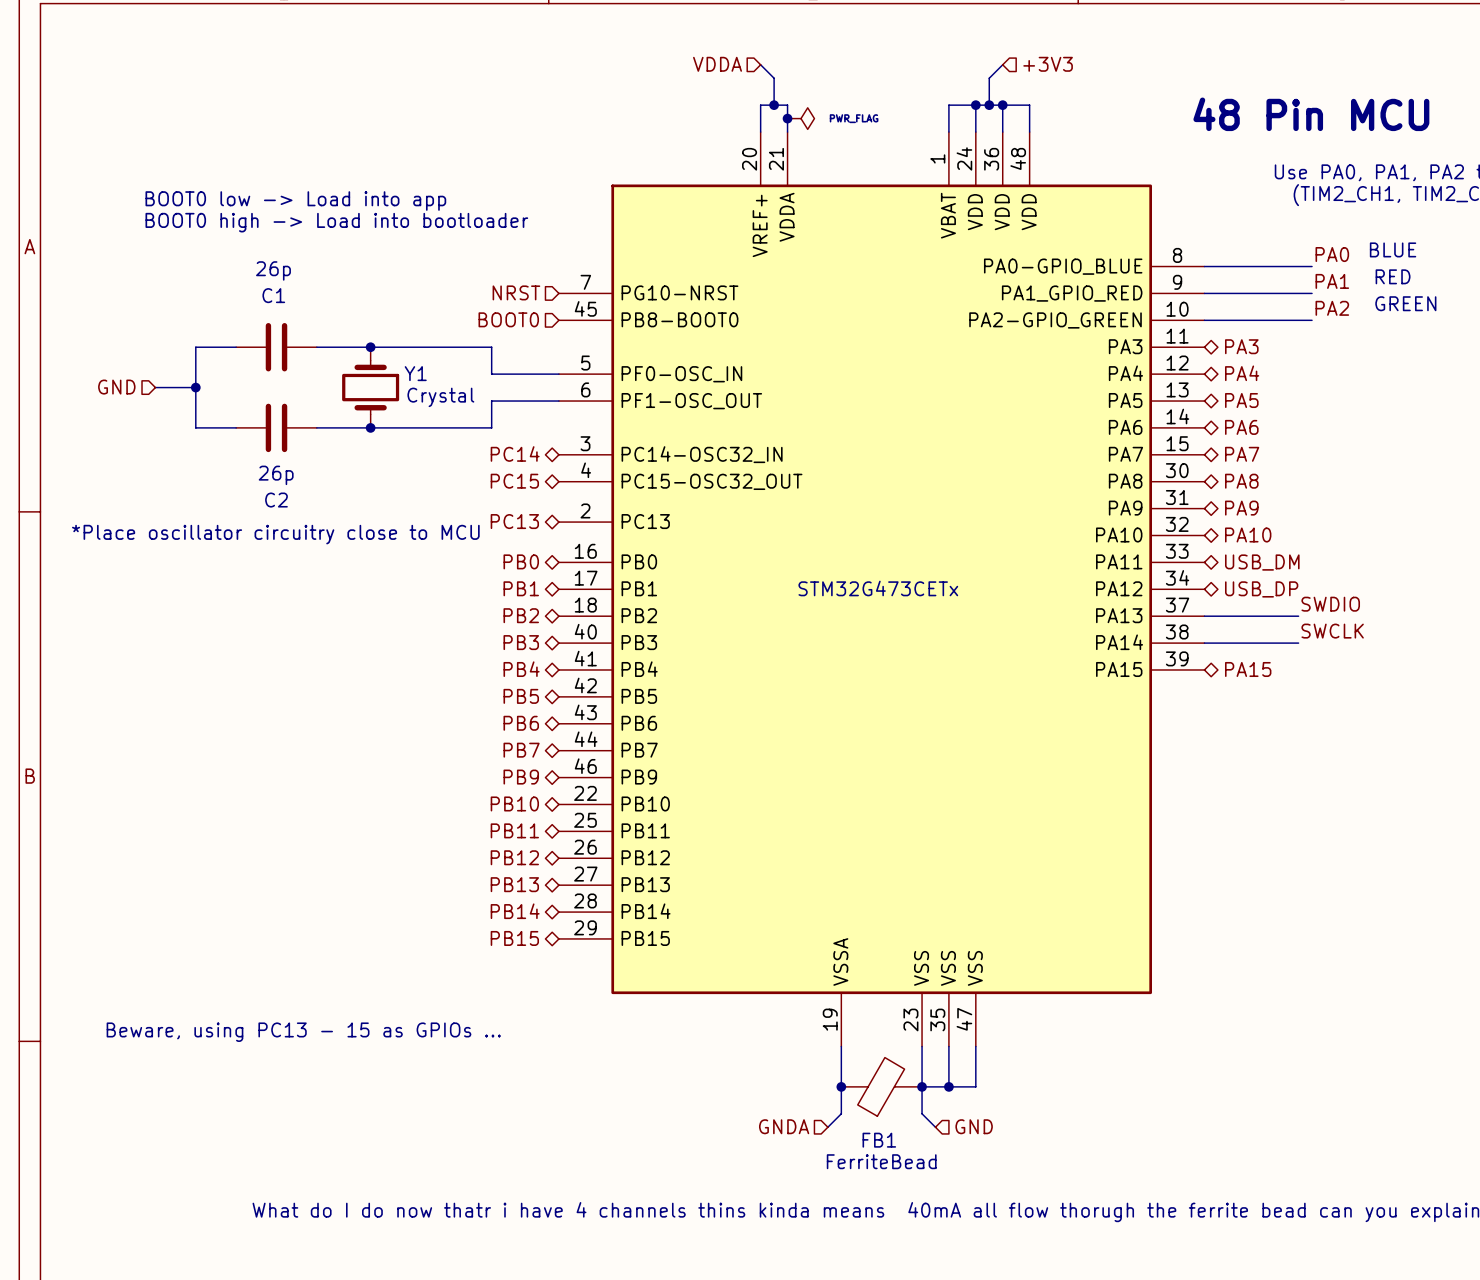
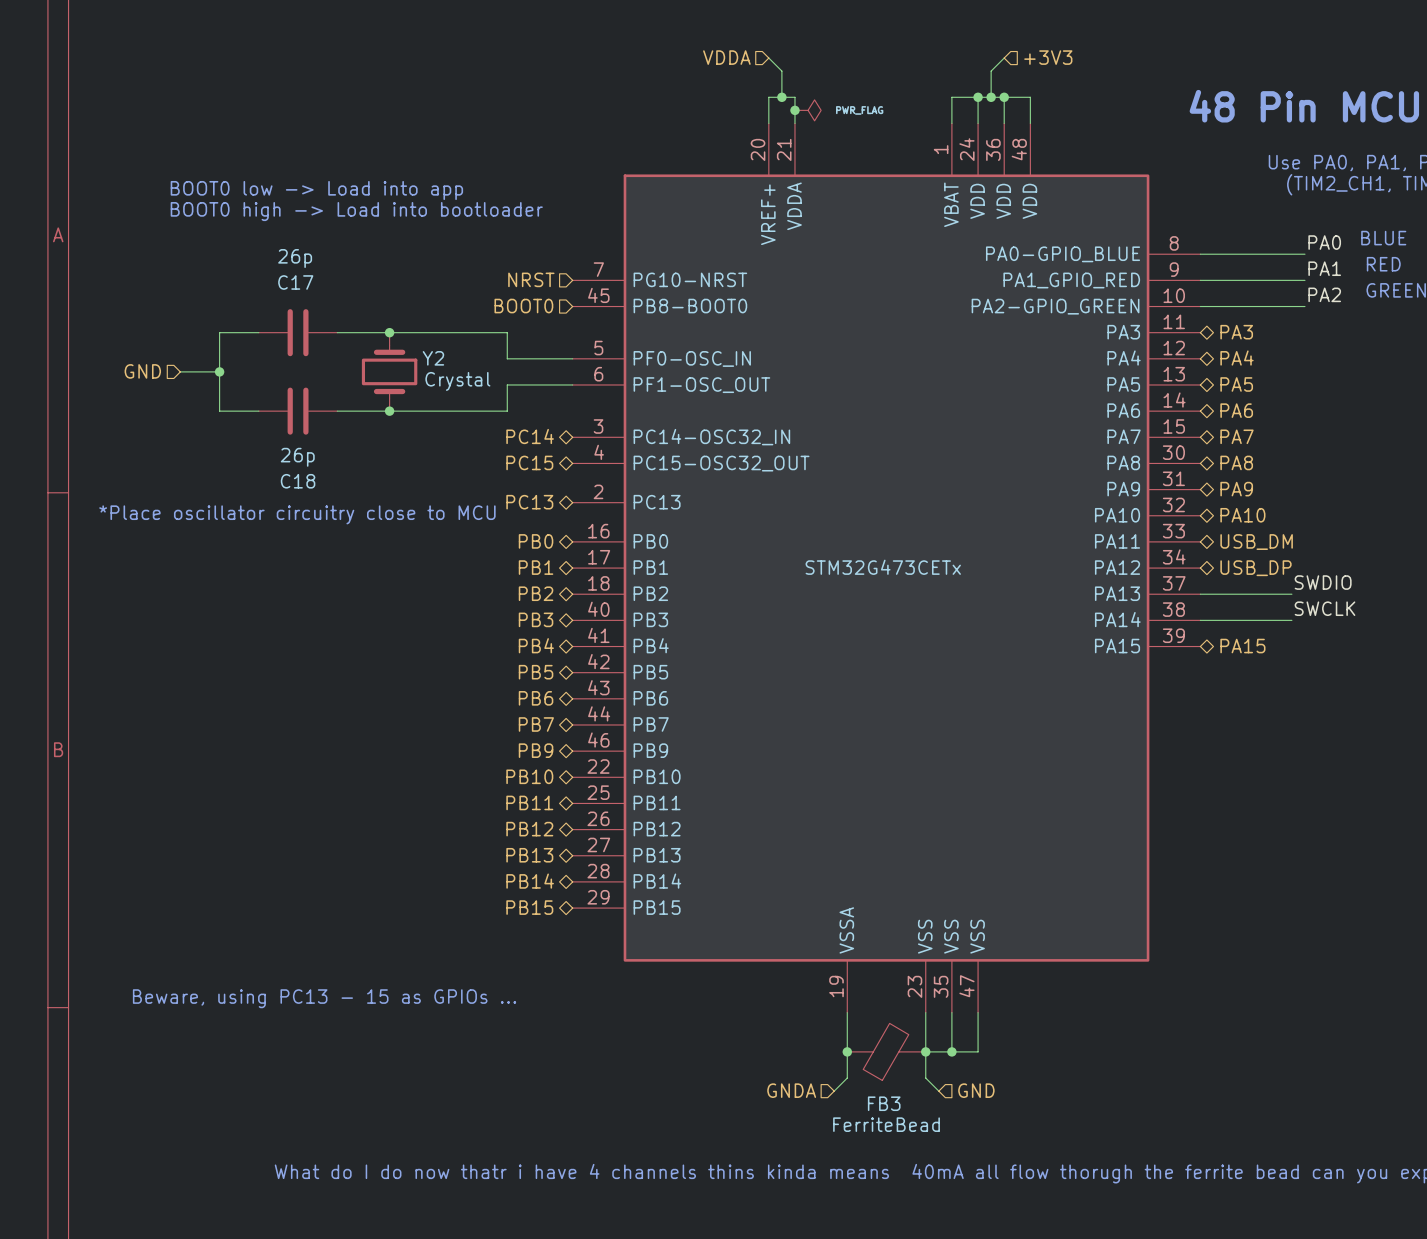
C1 name: C1 (273, 295) -> C17 (295, 282)
Y1 name: Y1 (415, 373) -> Y2 (433, 358)
C2 name: C2 (276, 500) -> C18 (298, 481)
FB1 name: FB1 (879, 1140) -> FB3 (884, 1103)

